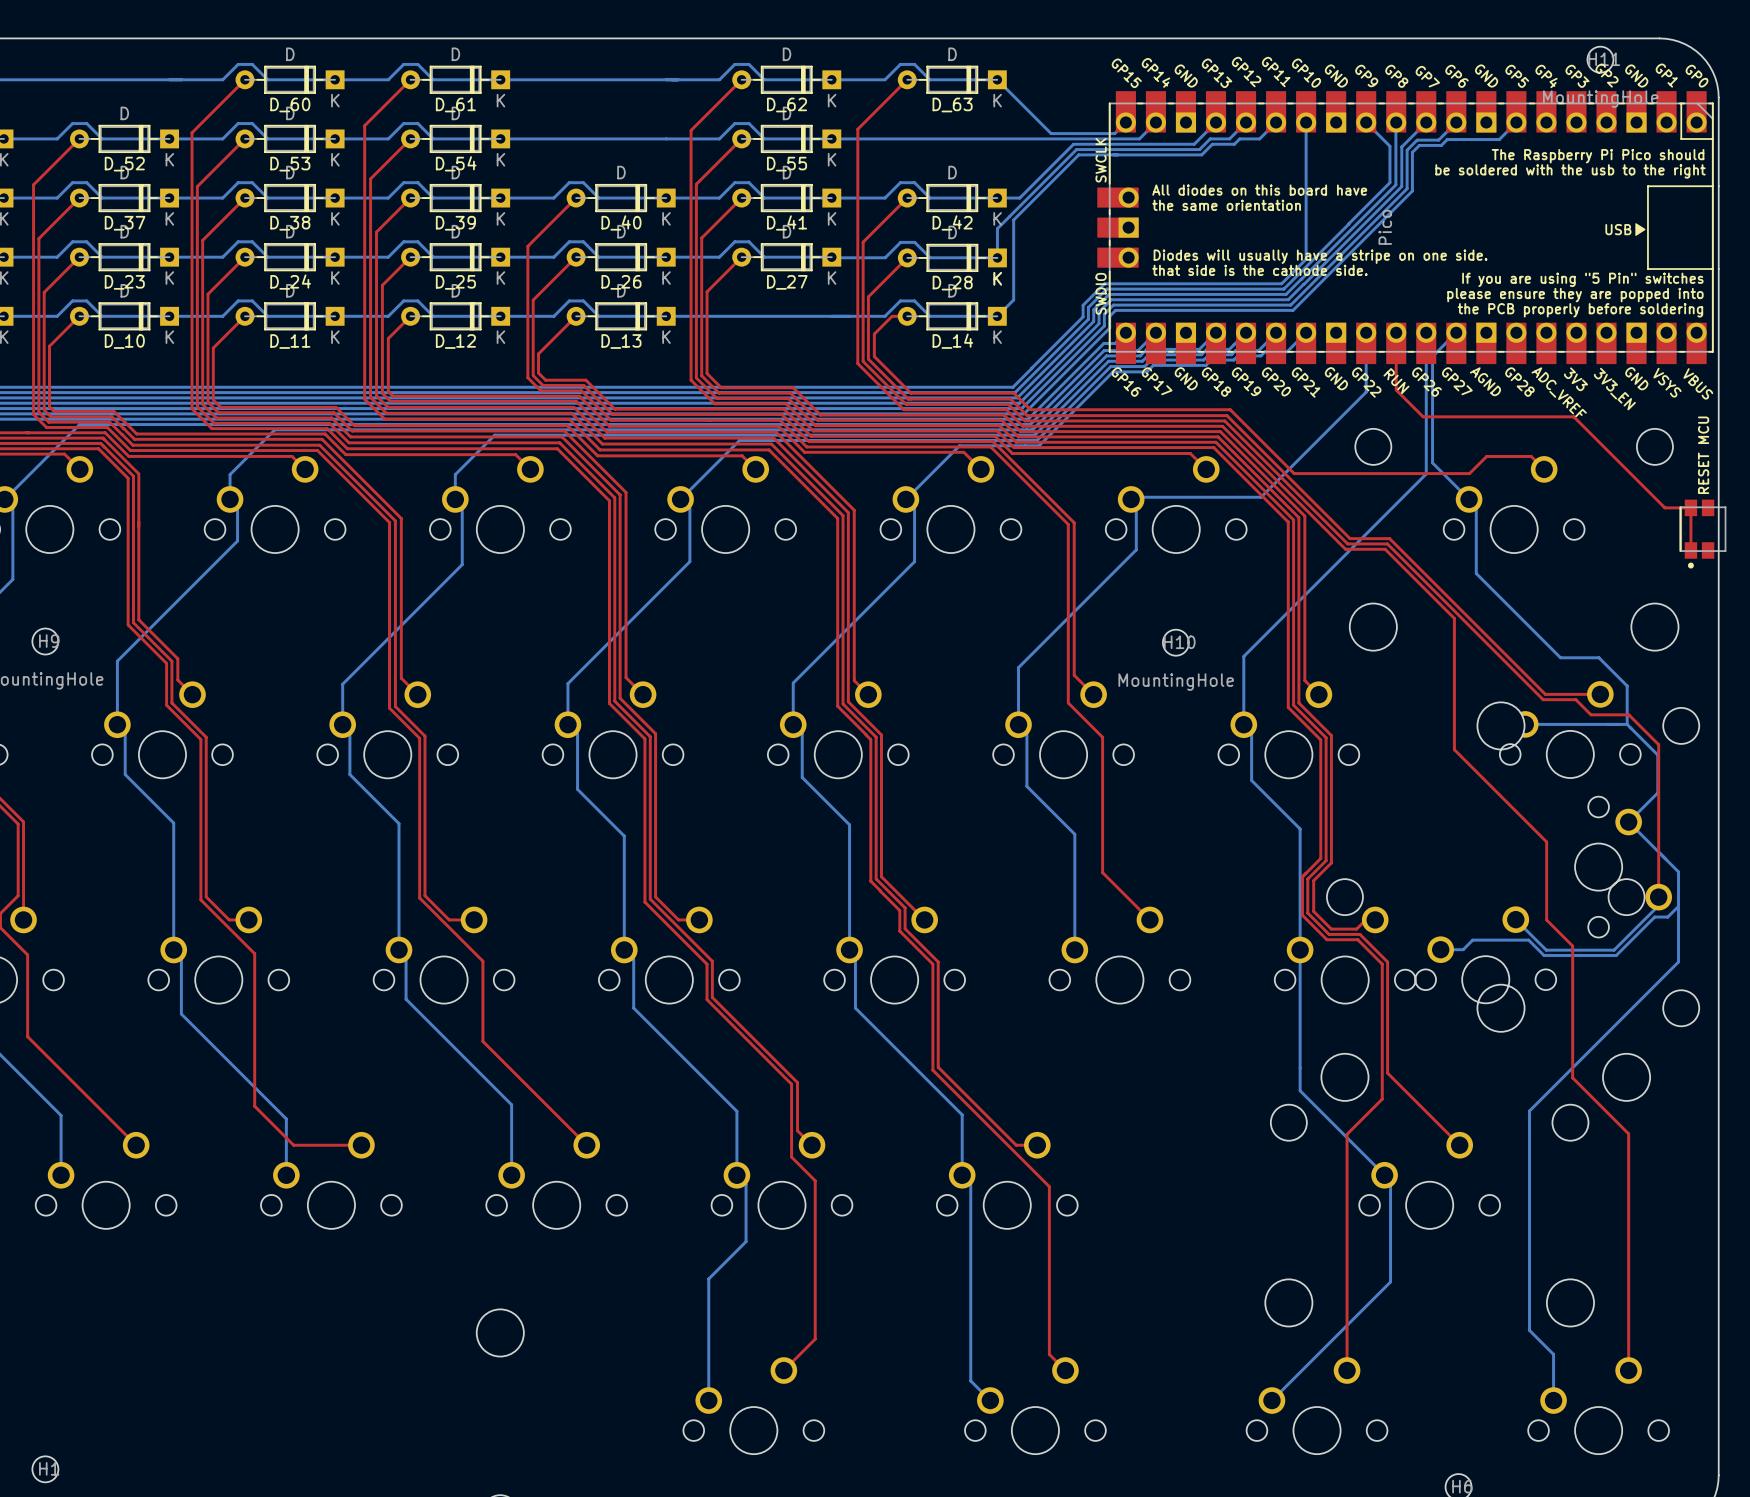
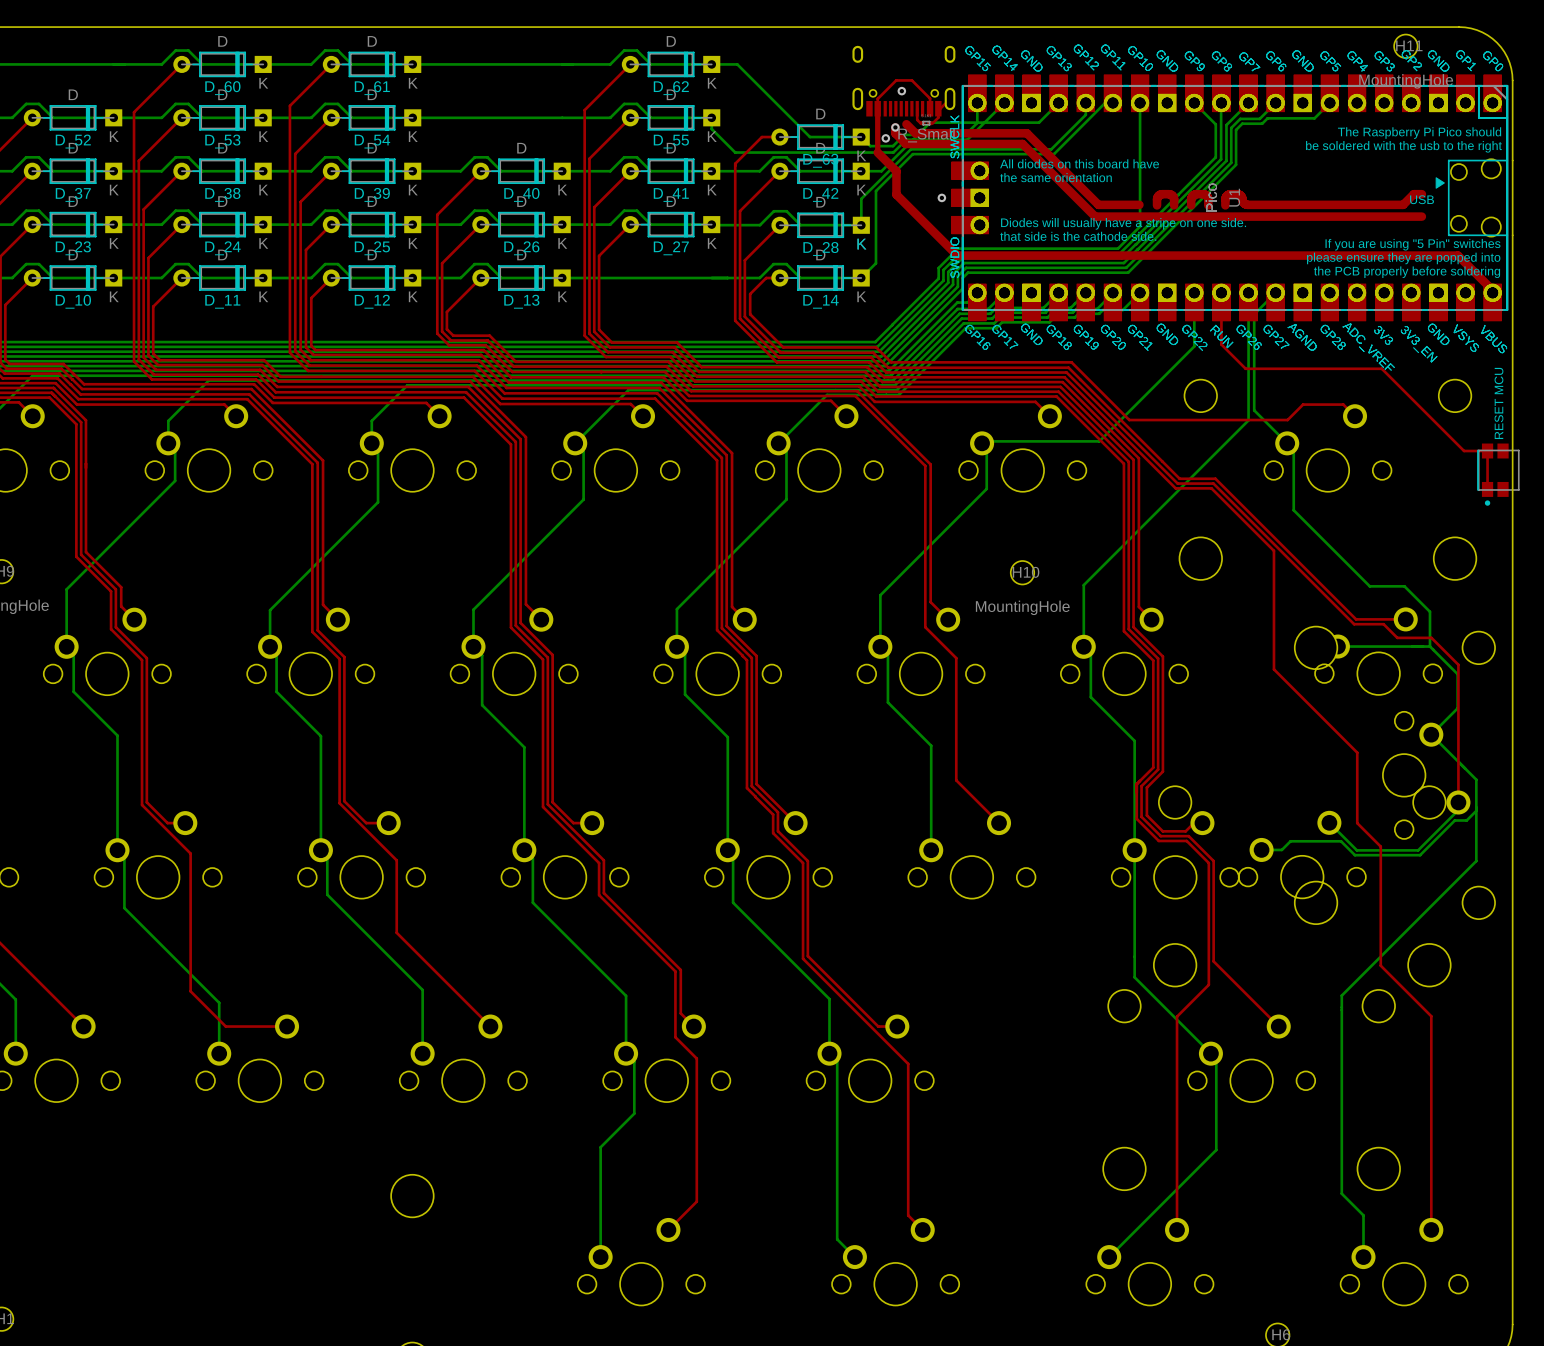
bottom track: (860, 79) (885, 79) (900, 64) (914, 64) (929, 79) (997, 79) (1051, 133) (1114, 133) (1125, 122) -> (737, 64) (809, 137) (861, 137) (870, 146) (893, 146) (904, 134) (965, 134) (977, 122) (977, 102)
top track: (907, 79) (857, 129) (857, 189) -> (779, 137) (761, 137) (735, 163)
D_63 position: (952, 79) -> (820, 137)
part: none -> (903, 81)
via: none -> (901, 91)
top track: none -> (950, 98) (938, 108) (938, 117) (932, 123) (929, 123)
bottom track: (1155, 122) (1139, 138) (831, 138) -> (1004, 102) (967, 139) (906, 139) (893, 152) (735, 152) (711, 129) (711, 117)
bottom track: (1246, 122) (1229, 138) (1210, 138) (1199, 149) (1076, 149) (1052, 173) -> (1085, 102) (1085, 114) (1051, 149) (910, 149)
bottom track: (1276, 122) (1259, 138) (1239, 138) (1234, 144) (1212, 144) (1201, 154) (1078, 154) (1054, 179) -> (1112, 102) (1105, 102) (1053, 154) (912, 154)
top track: none -> (917, 108) (917, 119) (922, 123)
top track: none -> (930, 108) (930, 98) (911, 80) (896, 80) (877, 98) (877, 152) (896, 171) (896, 194) (957, 255) (1457, 255) (1492, 290) (1492, 292)
part: none -> R_Small (926, 123)
top track: none -> (906, 124) (915, 133) (1026, 133) (1098, 204) (1139, 204)
top track: none -> (895, 127) (895, 133) (905, 143) (1022, 143) (1095, 216) (1421, 216)
via: none -> (895, 127)
via: none -> (885, 138)
top track: none -> (1421, 194) (1413, 194) (1403, 204) (1247, 204) (1243, 202) (1239, 194) (1230, 194) (1225, 197) (1225, 205)
via: none -> (941, 197)
U1: none -> Pico (1229, 197)
drawing position: (1640, 229) -> (1440, 182)
top track: none -> (1157, 205) (1157, 197) (1162, 194) (1172, 195) (1174, 205)
top track: none -> (1191, 205) (1191, 197) (1196, 194) (1206, 195) (1208, 205)

